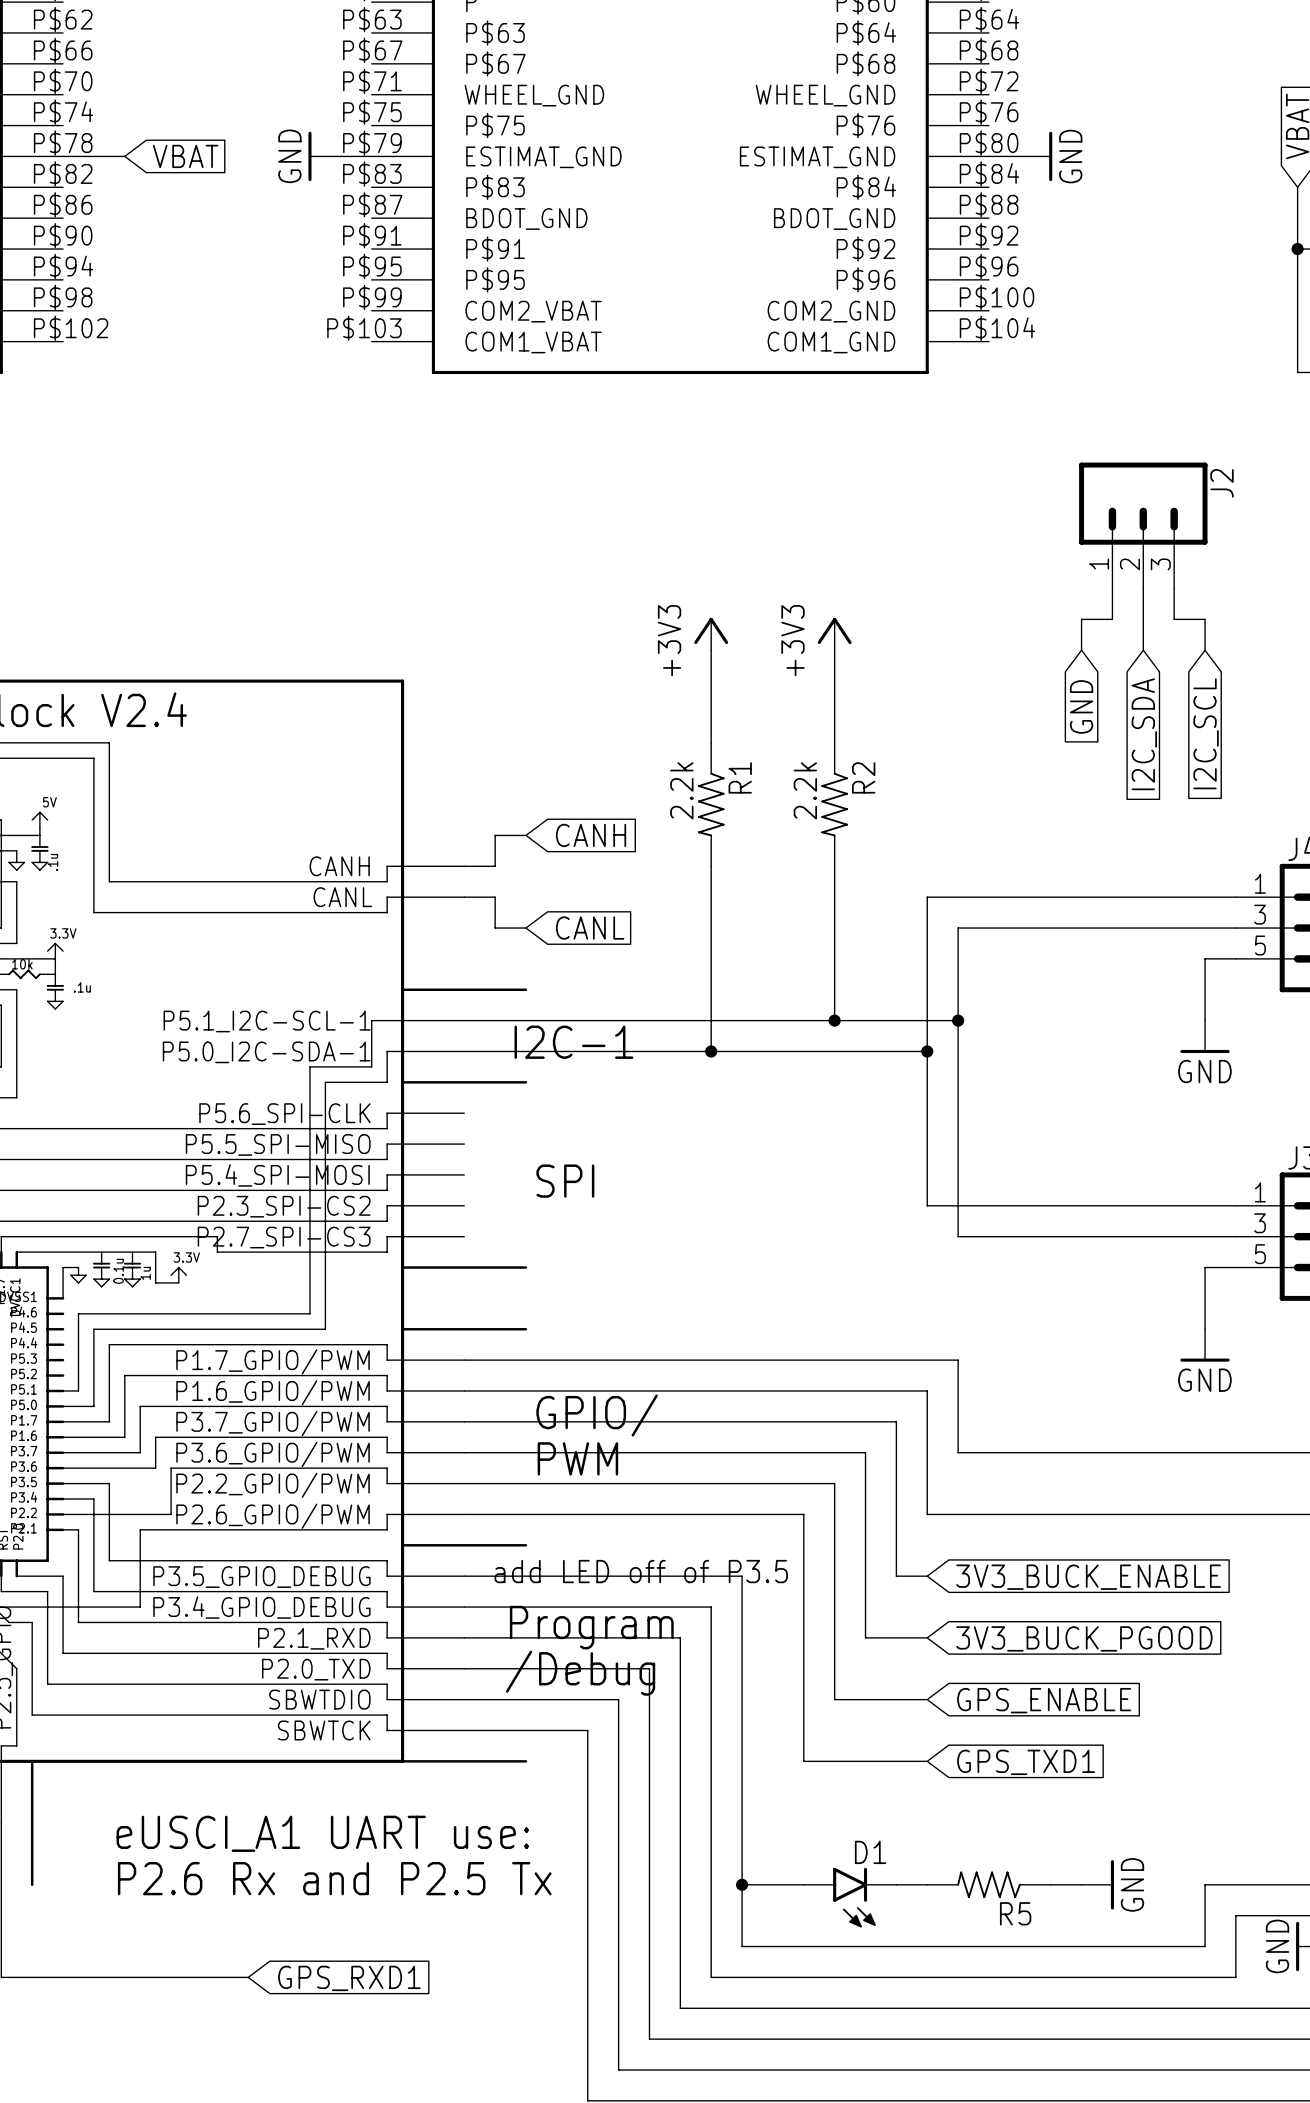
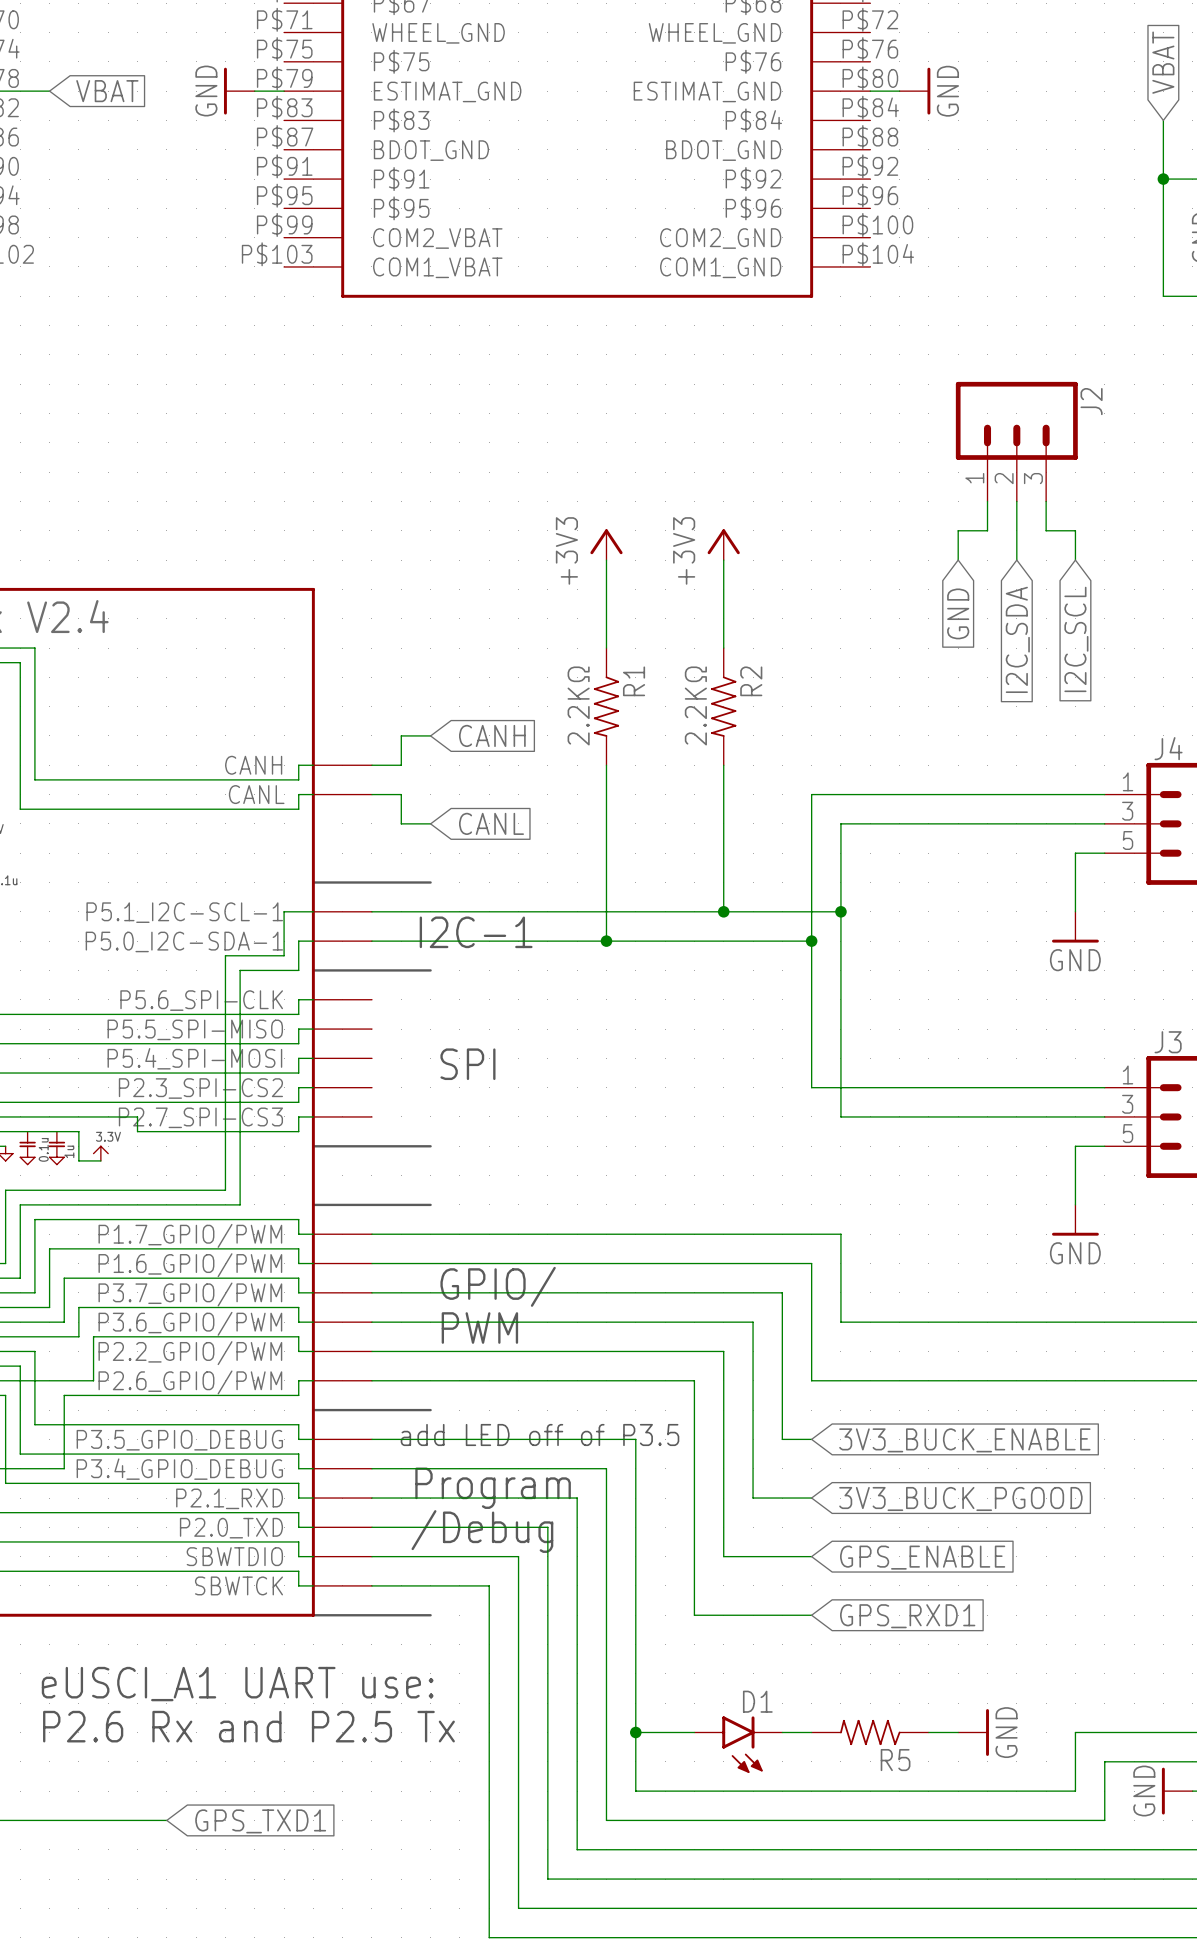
R1 value: 2.2k (681, 790) -> 2.2KΩ (578, 705)
R2 value: 2.2k (805, 790) -> 2.2KΩ (695, 705)
global label: GPS_TXD1 (1026, 1762) -> GPS_RXD1 (907, 1616)
global label: GPS_RXD1 (349, 1978) -> GPS_TXD1 (260, 1821)

